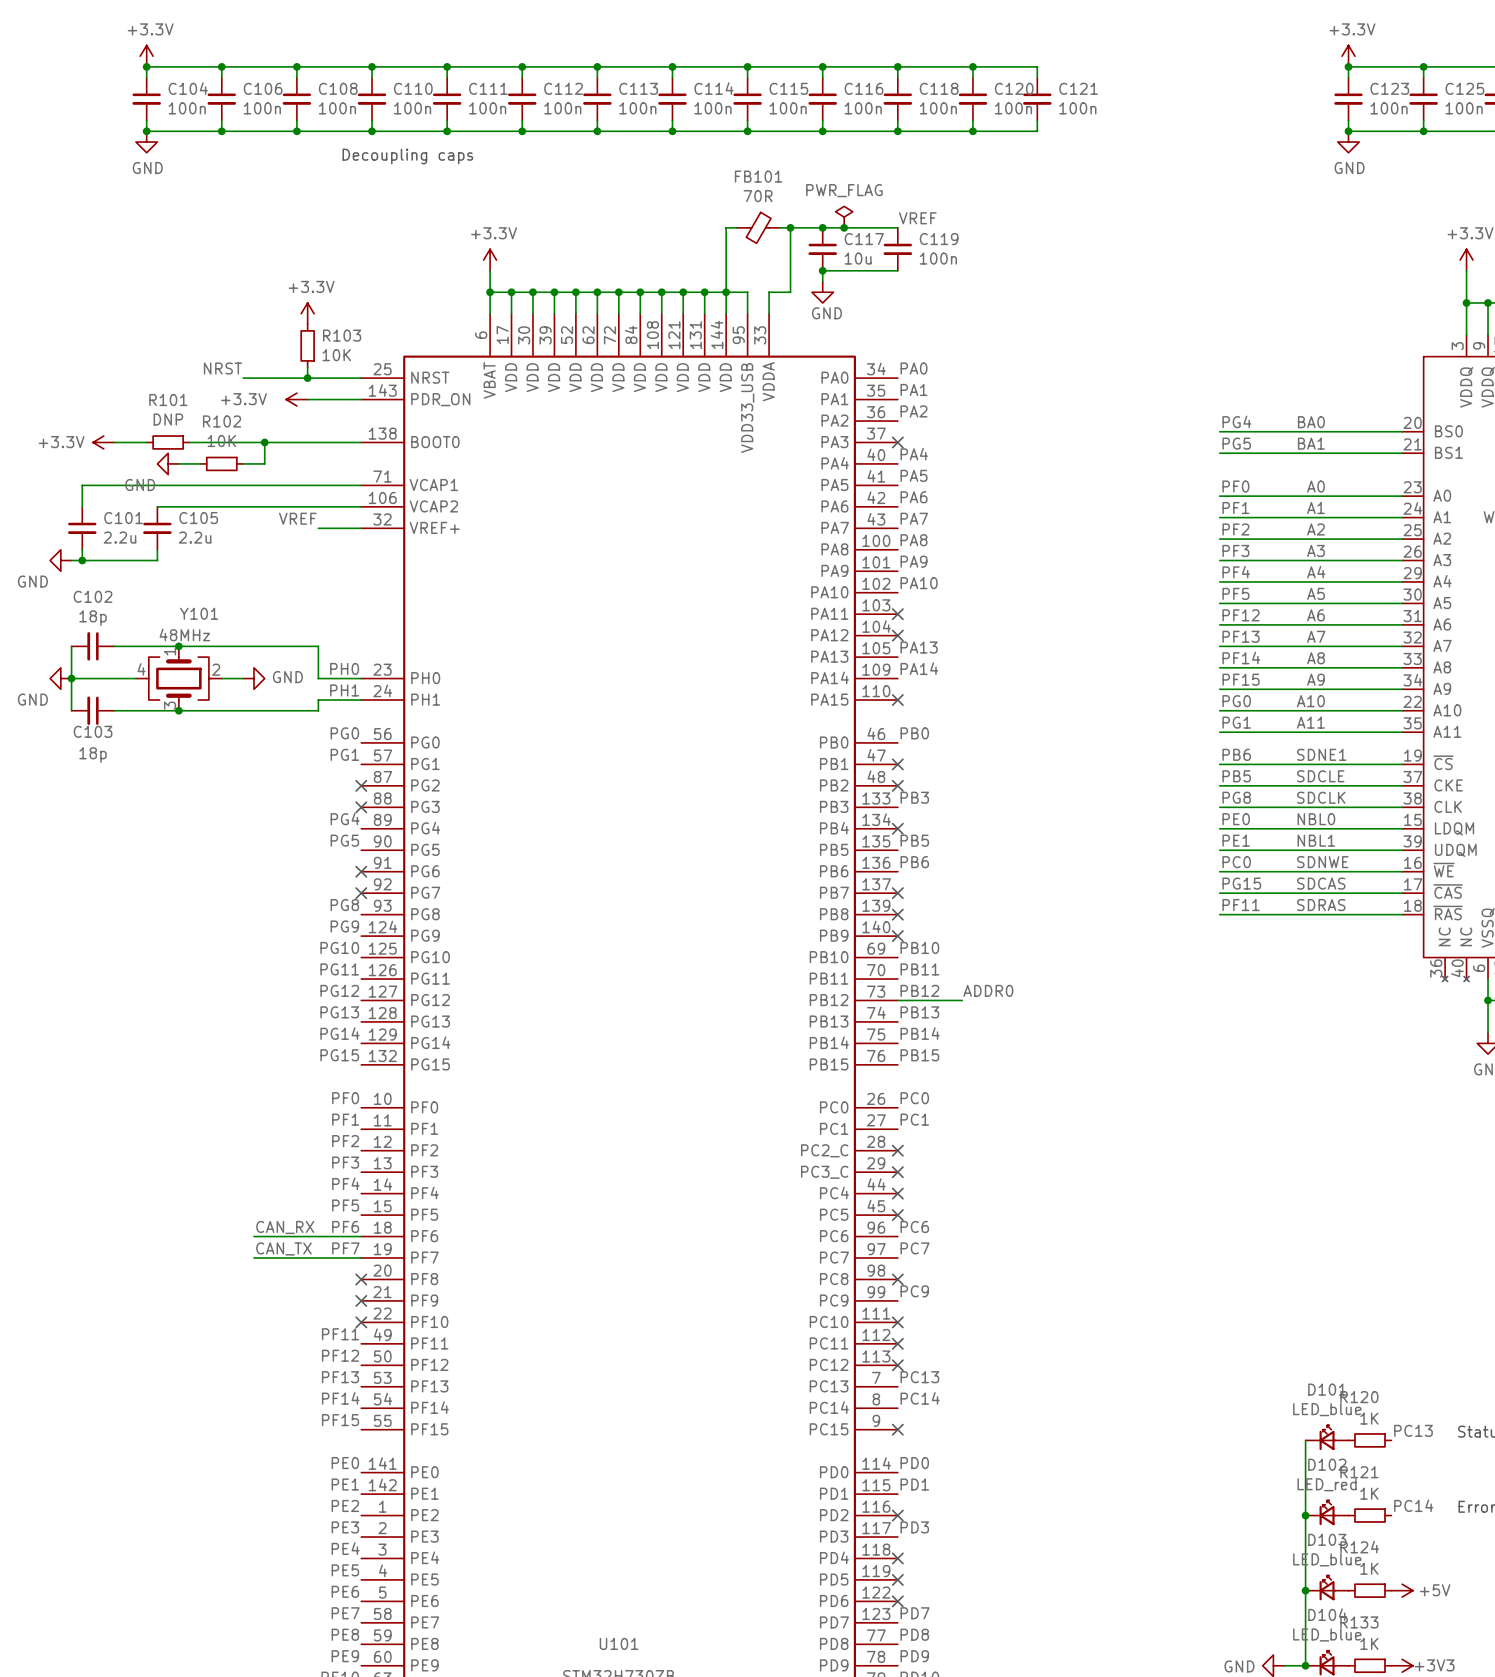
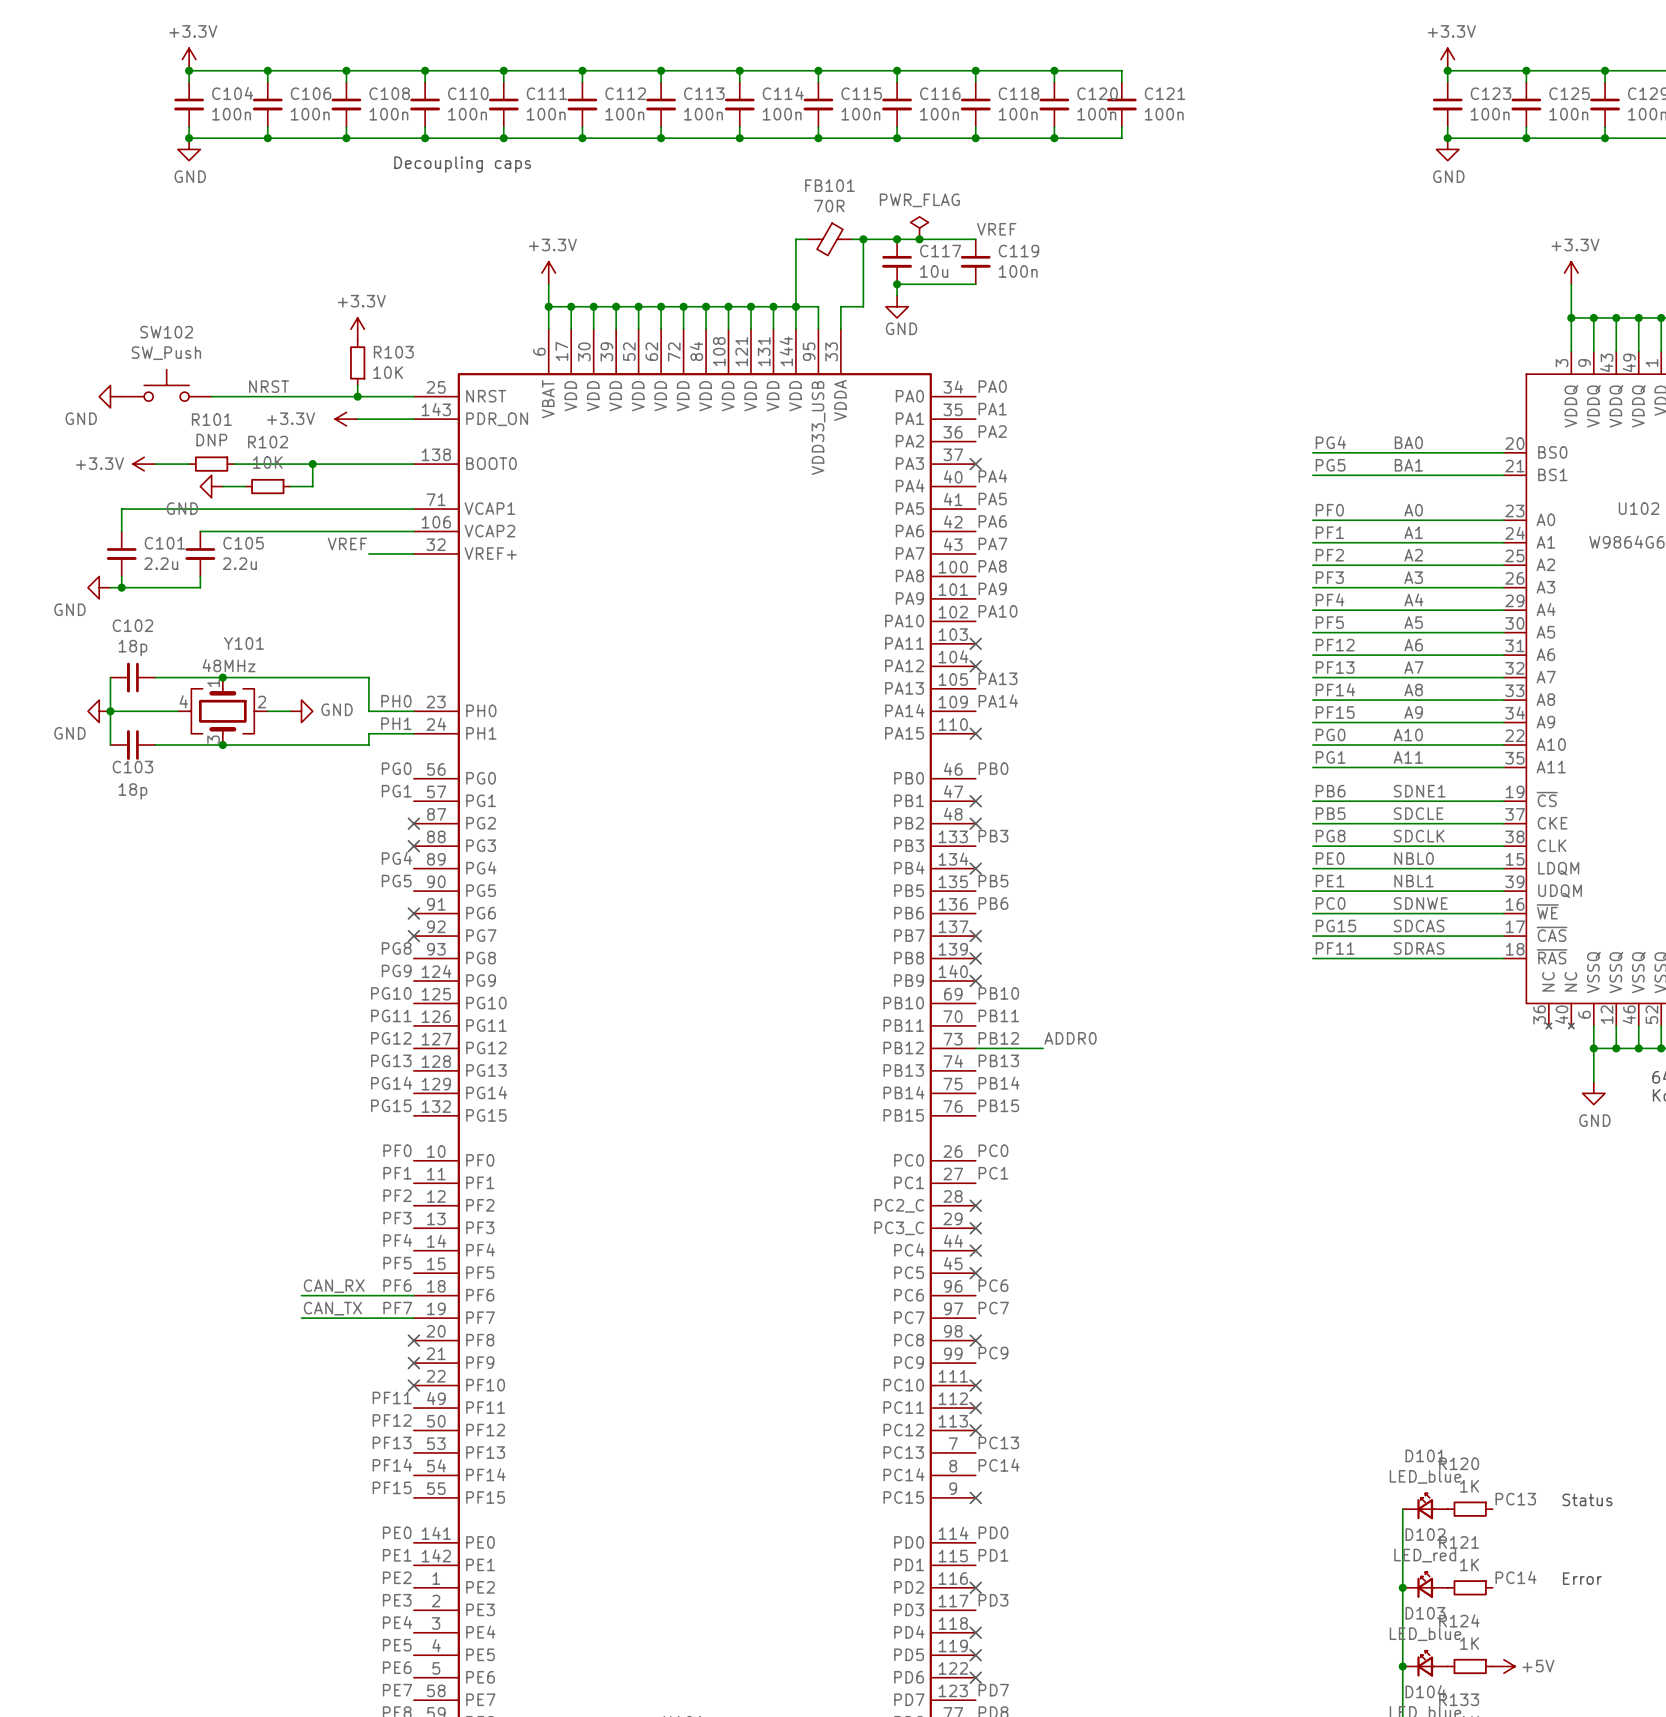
SW102: none -> SW_Push (166, 385)
power symbol: none -> GND (110, 396)
wire: none -> (211, 396) (290, 396)

